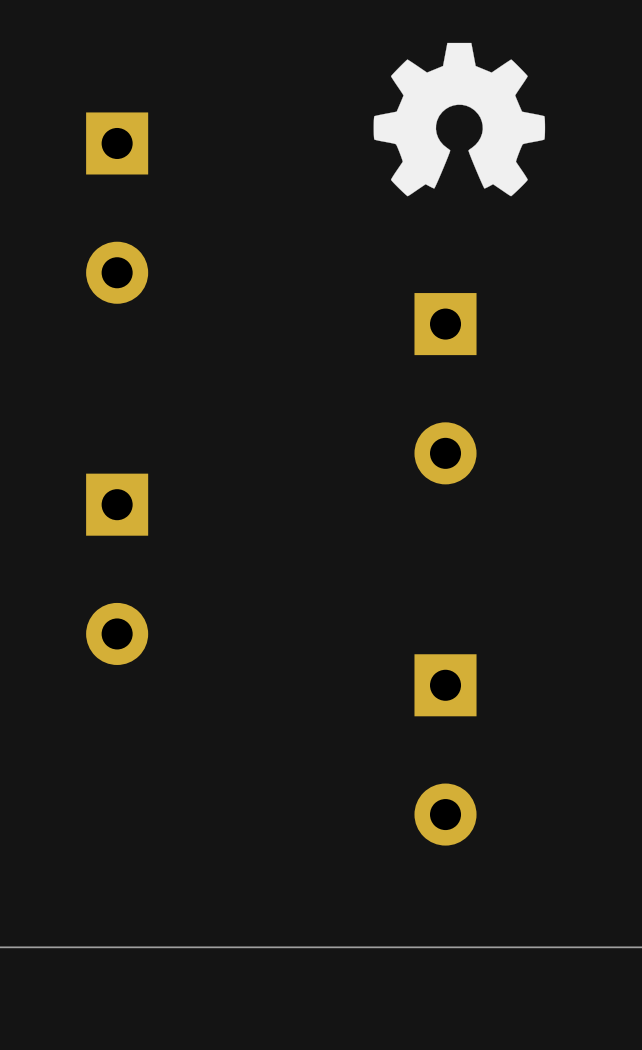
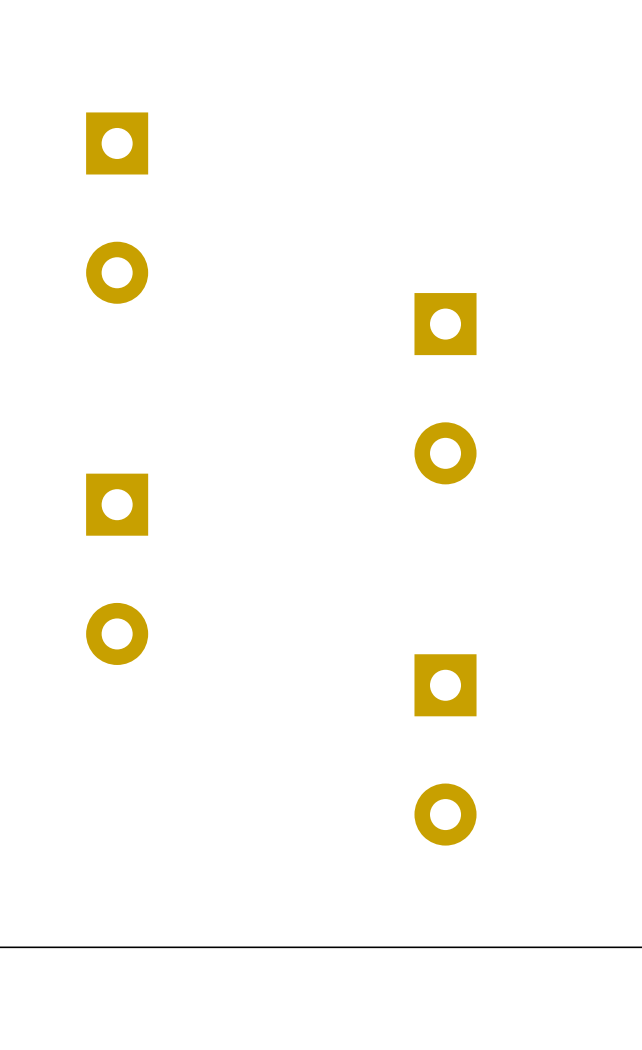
drawing: [373, 42, 546, 197] -> none

